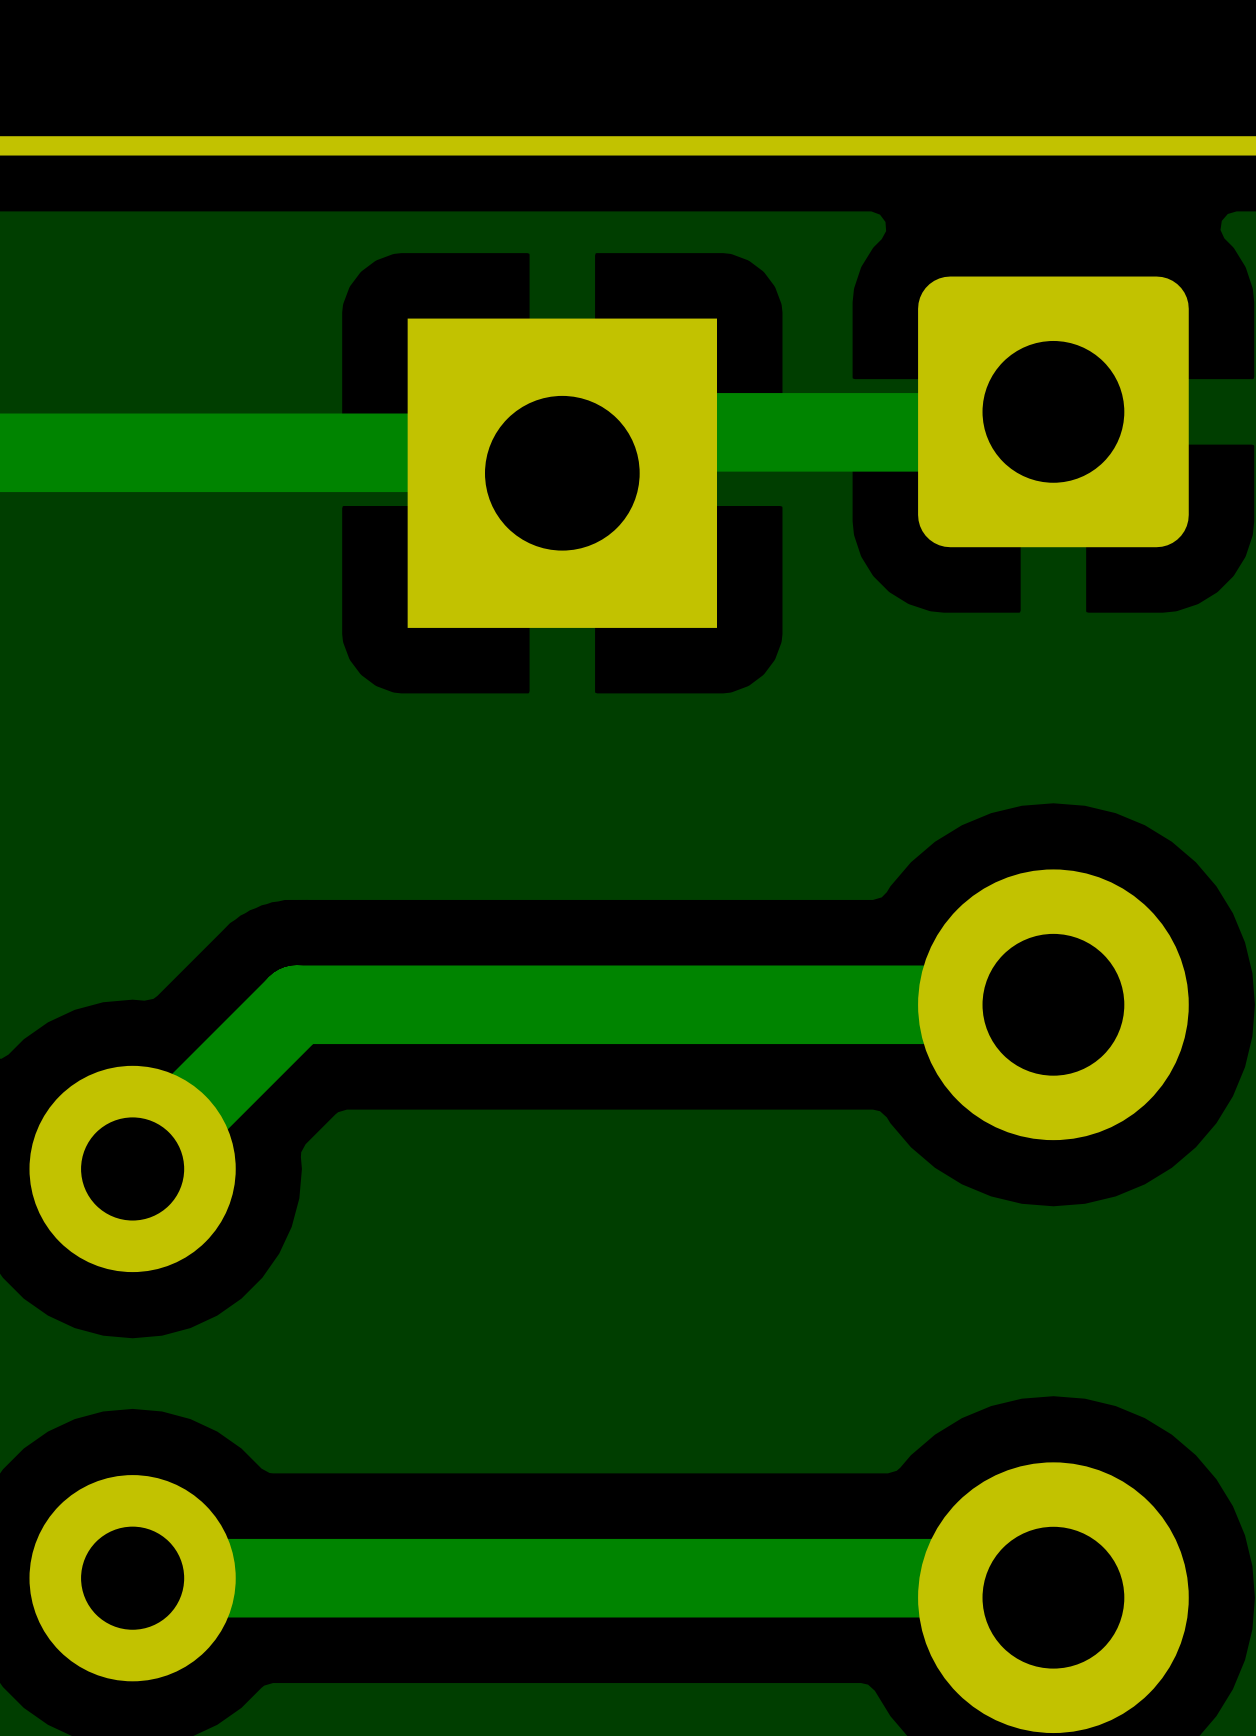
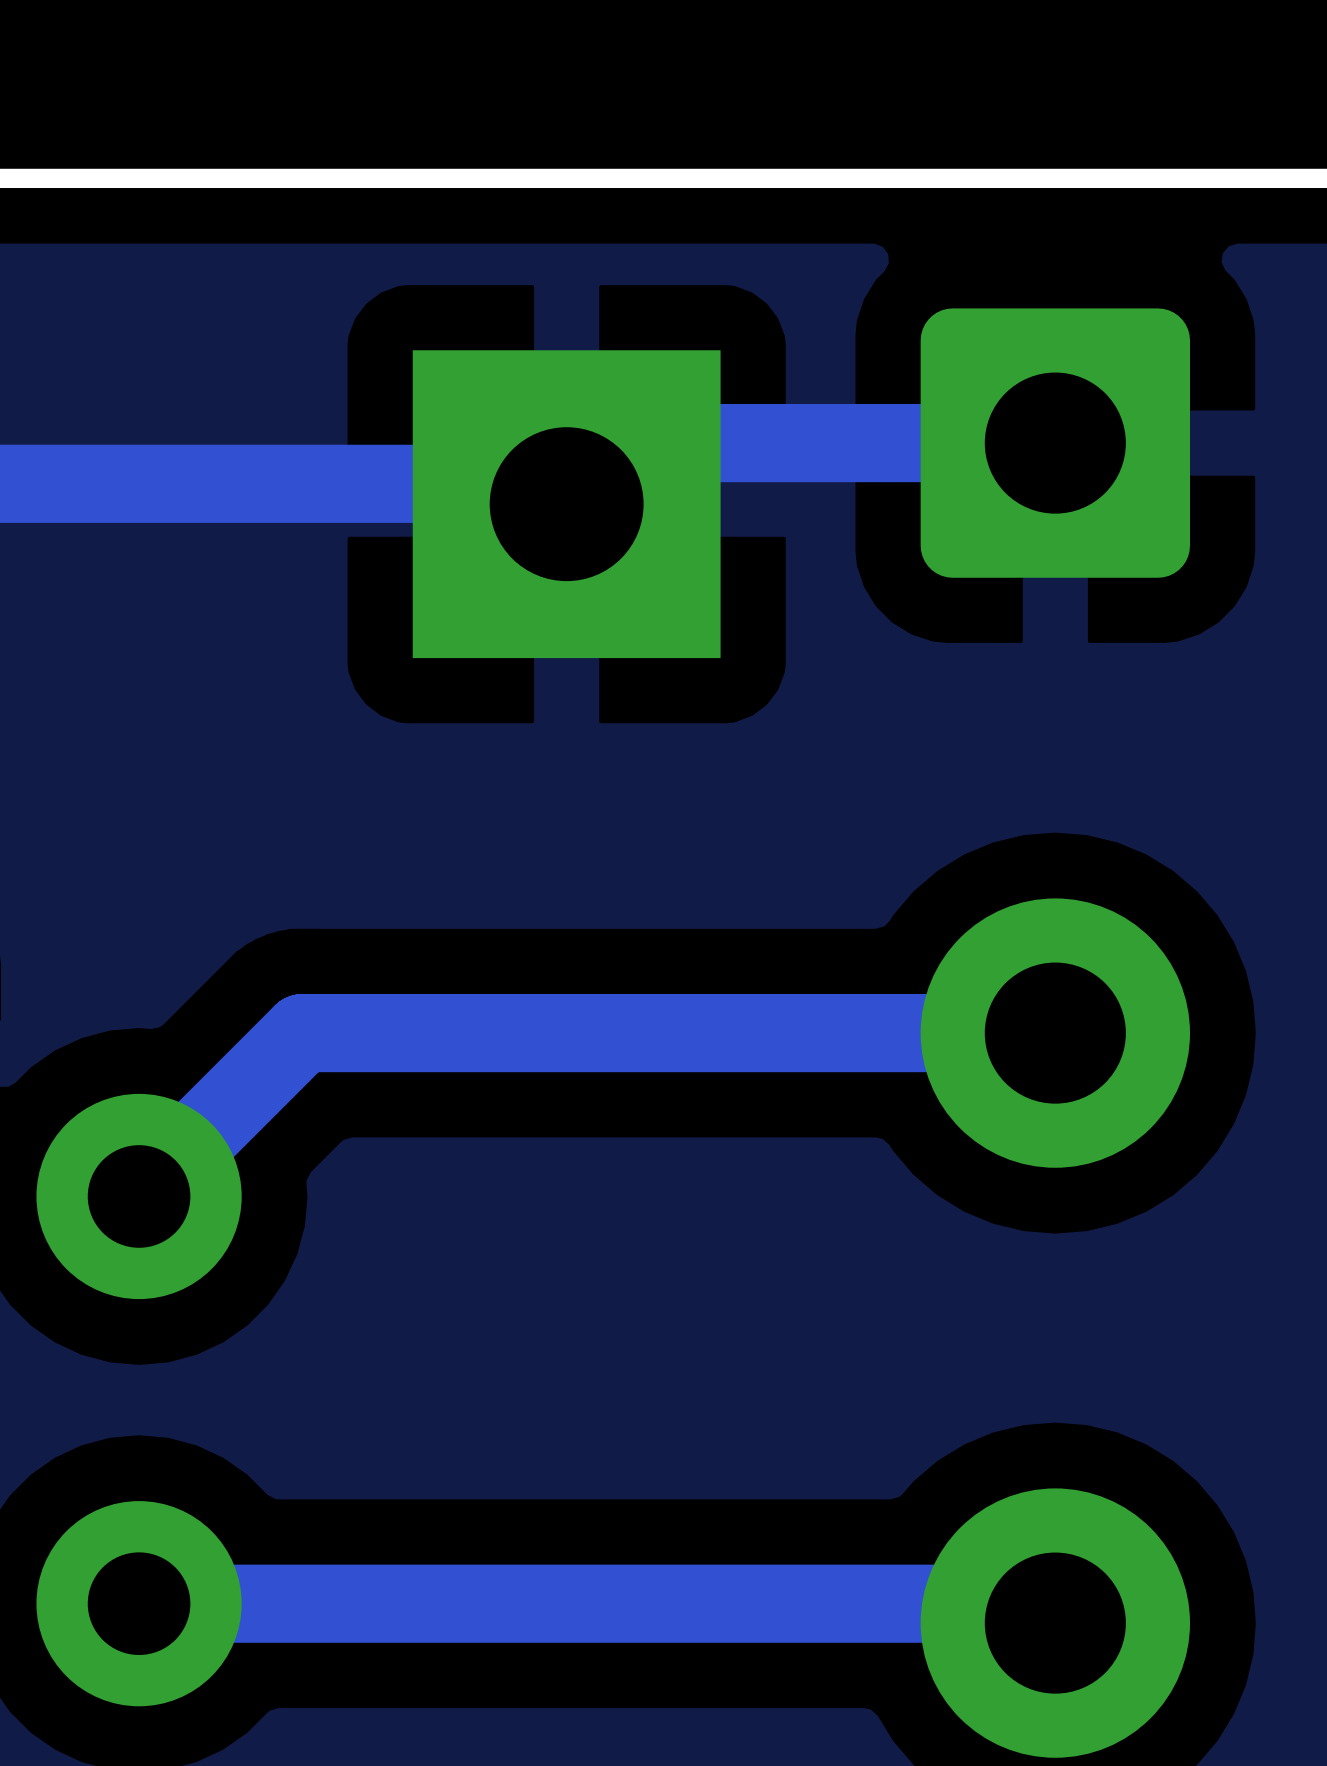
track: (1053, 432) (623, 432) -> (1055, 443) (627, 443)

